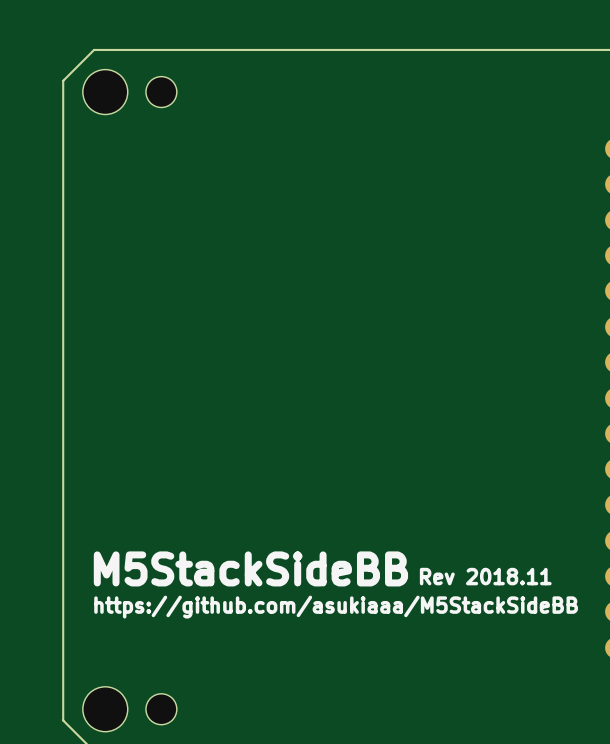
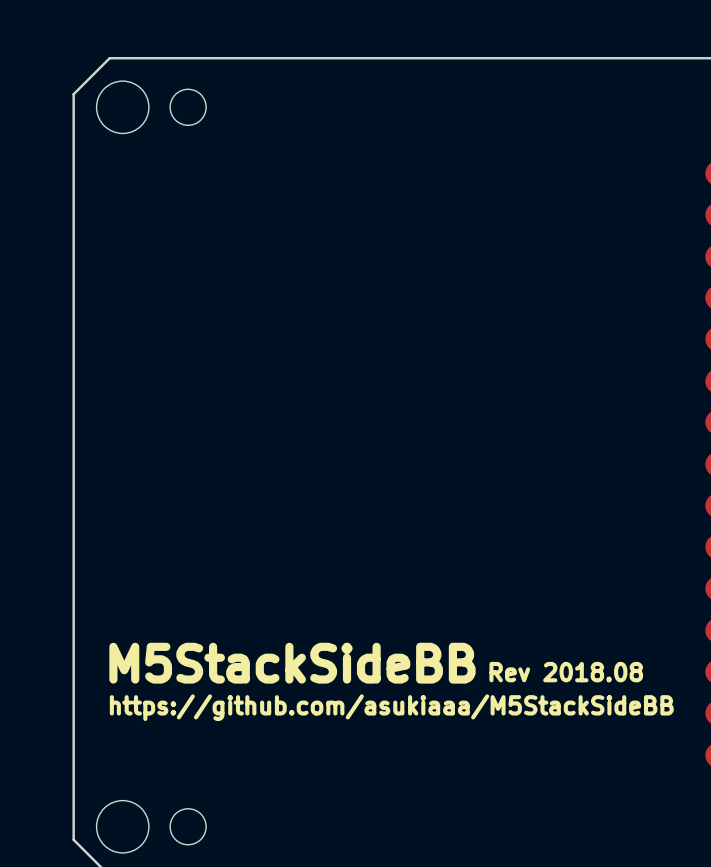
text: Rev 2018.11 (485, 576) -> Rev 2018.08 (566, 672)

